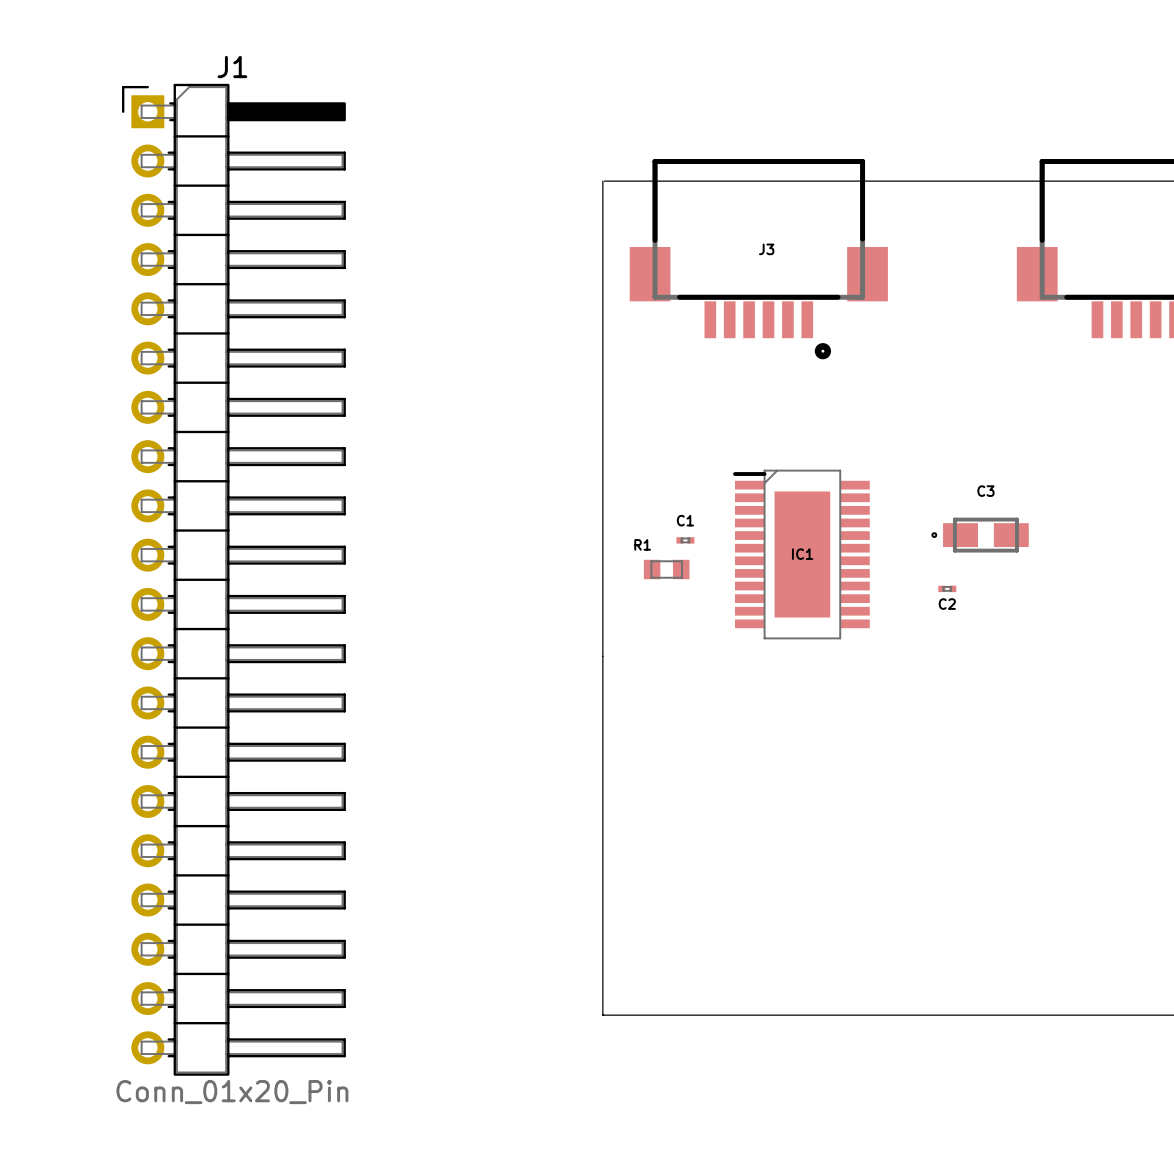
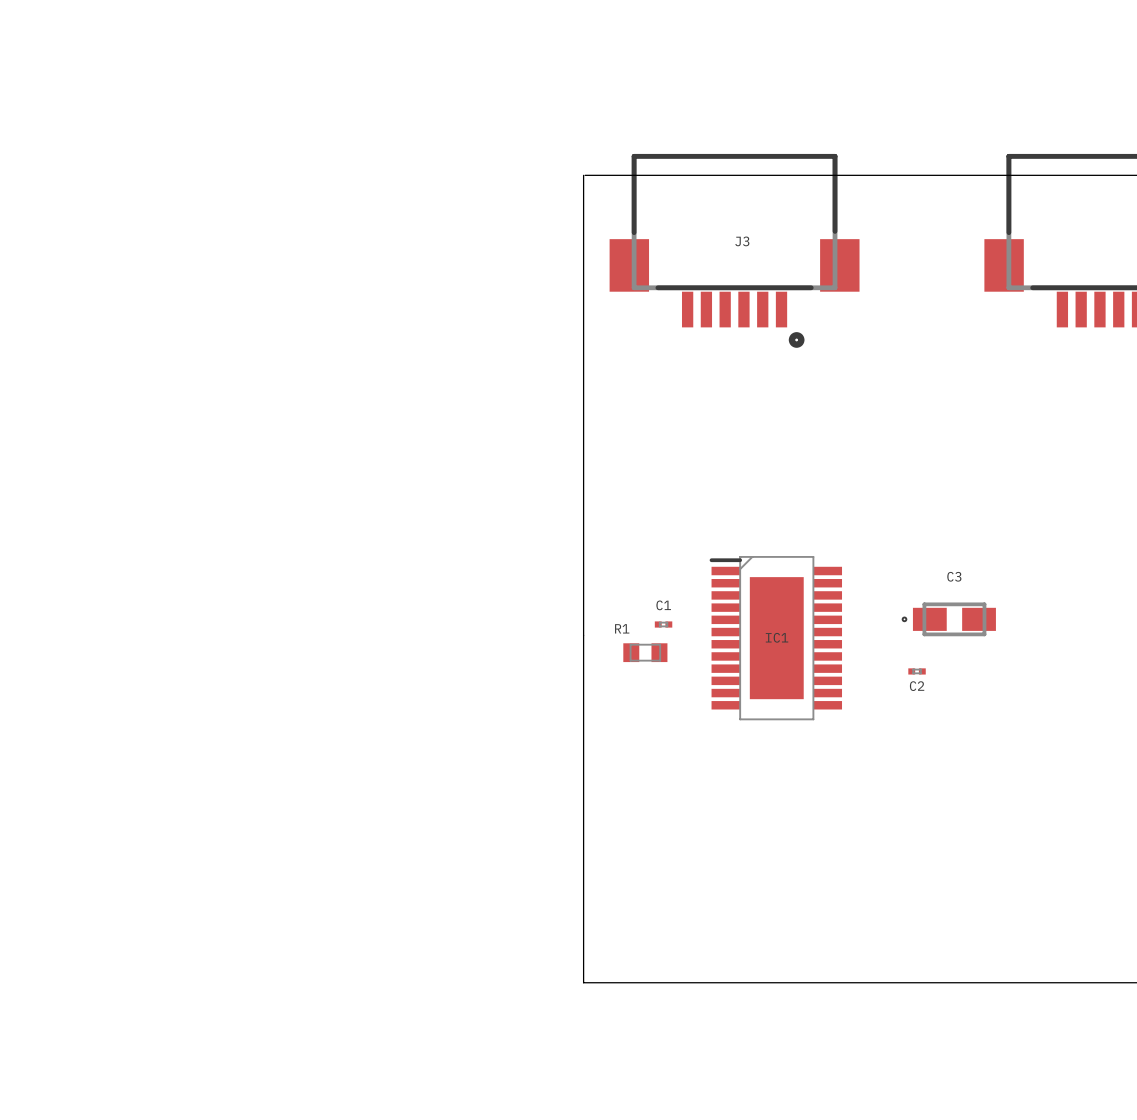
C3 position: (980, 535) -> (948, 619)
C1 position: (685, 540) -> (663, 624)
IC1 position: (801, 554) -> (775, 638)
R1 position: (666, 569) -> (645, 652)
J1: Conn_01x20_Pin (233, 579) -> none
C2 position: (947, 588) -> (917, 671)

